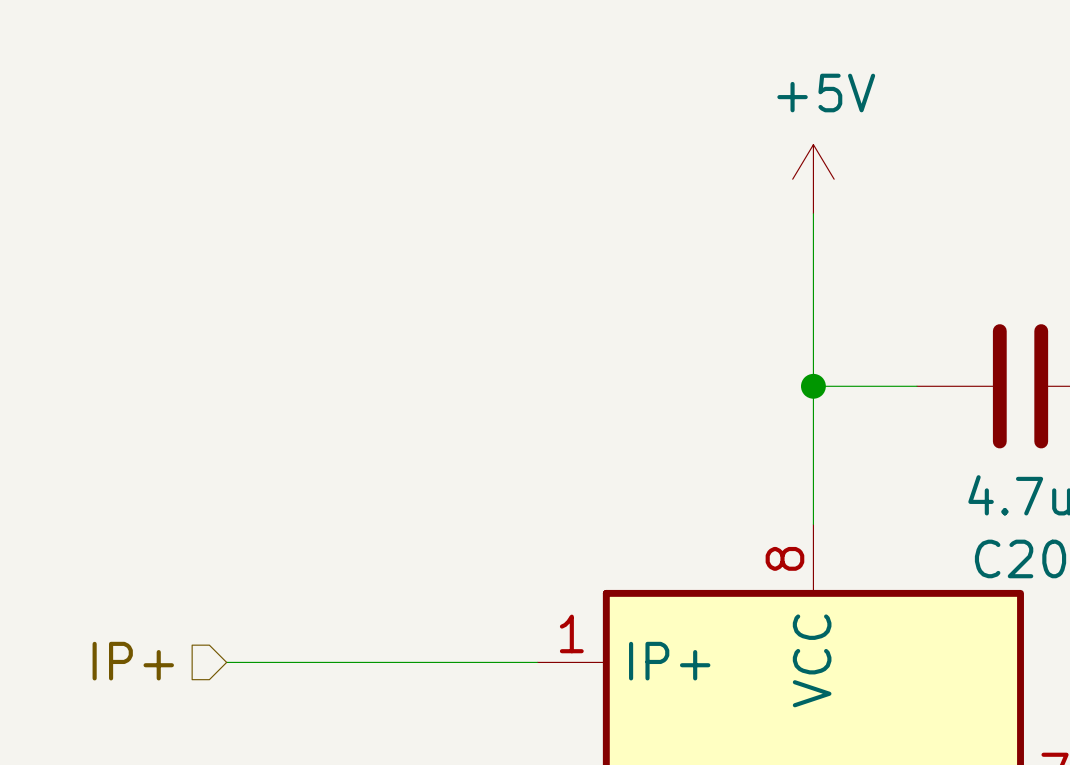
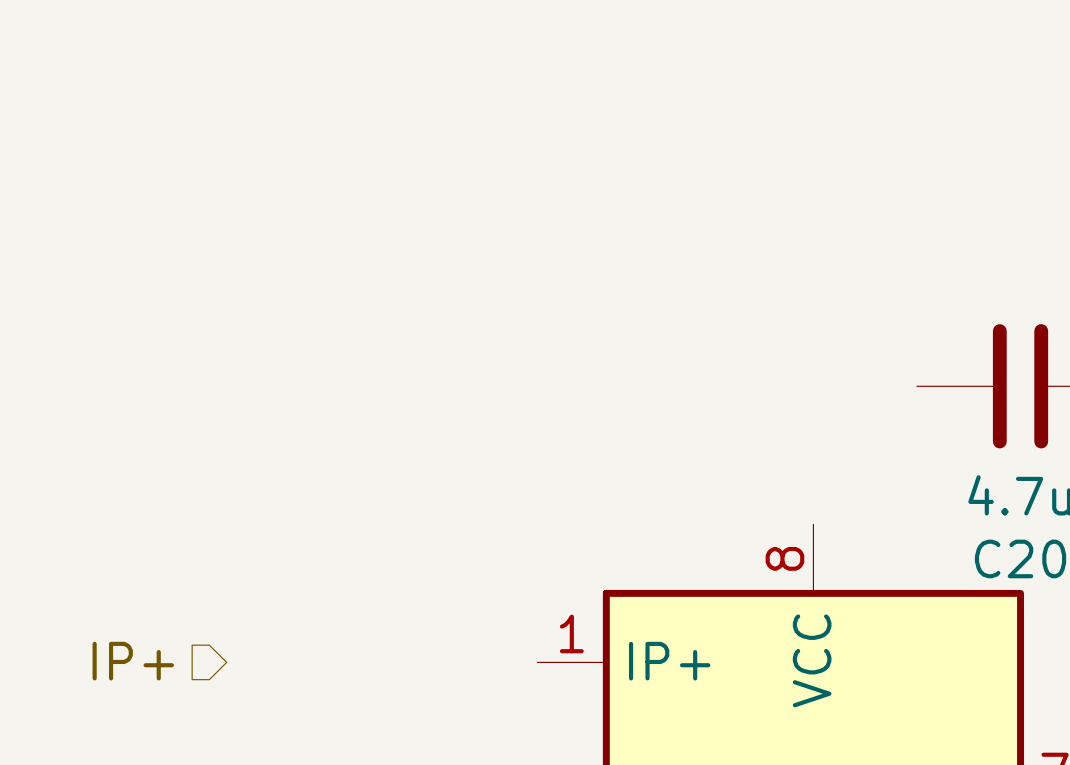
power symbol: +5V (813, 179) -> none
wire: (813, 213) (813, 524) -> none
wire: (813, 386) (916, 386) -> none
junction: (813, 386) -> none
wire: (226, 662) (537, 662) -> none

